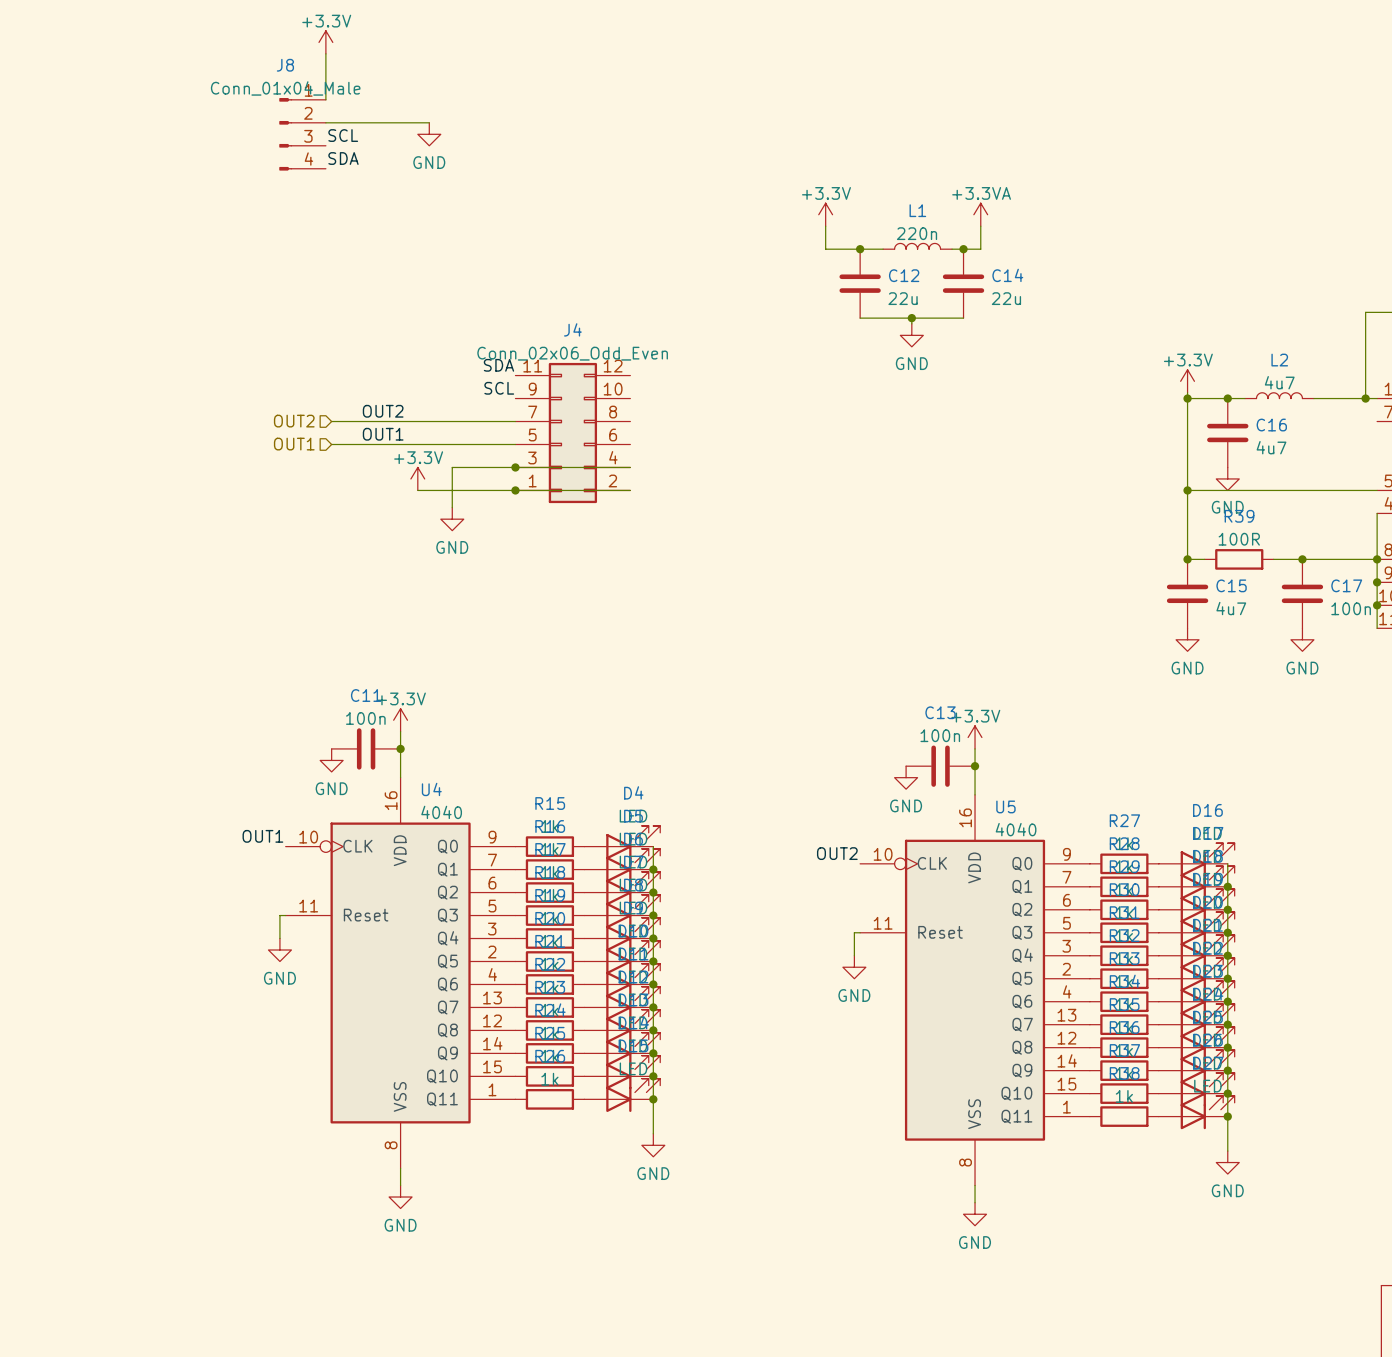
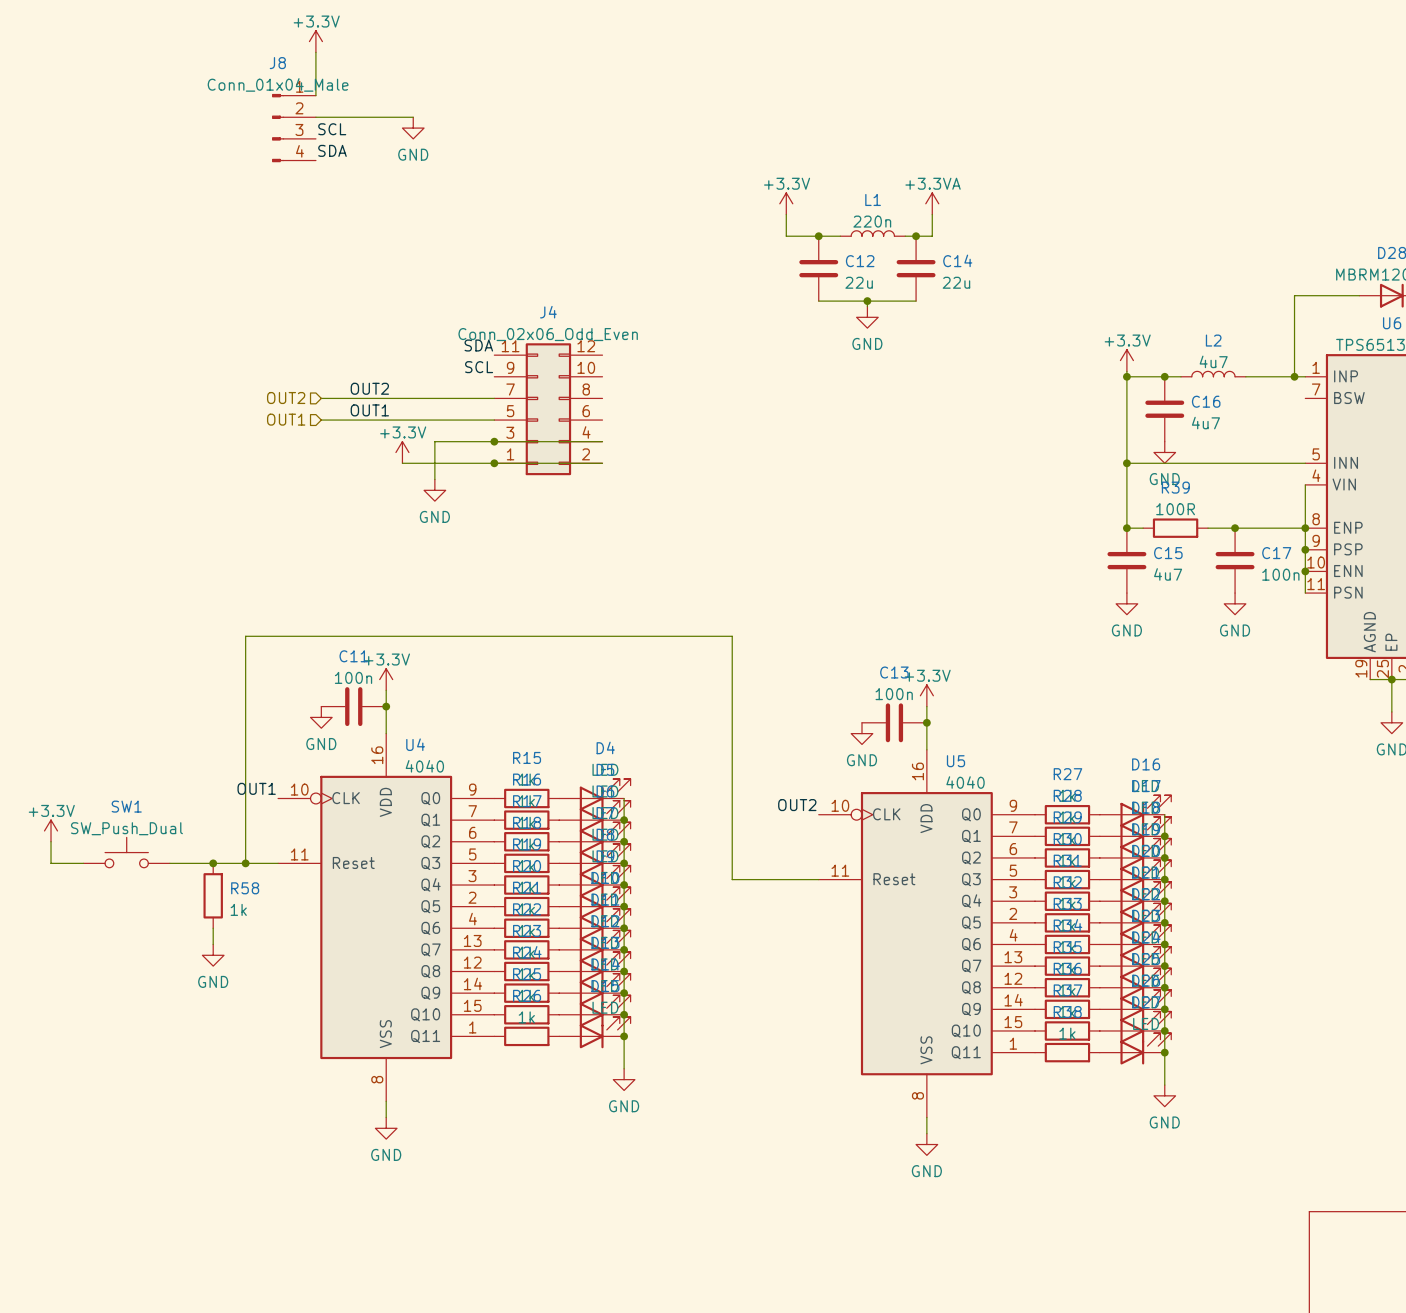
power symbol: none -> +3.3V (51, 830)
wire: none -> (51, 841) (51, 863) (83, 863)
SW1: none -> SW_Push_Dual (126, 852)
junction: none -> (213, 863)
junction: none -> (245, 863)
wire: (279, 915) (279, 938) -> (272, 863) (169, 863)
wire: (854, 932) (854, 955) -> (813, 879) (732, 879) (732, 636) (245, 636) (245, 863)
R58: none -> 1k (213, 895)
power symbol position: GND (279, 950) -> GND (213, 955)
power symbol: GND (854, 967) -> none
wire: none -> (213, 928) (213, 944)

